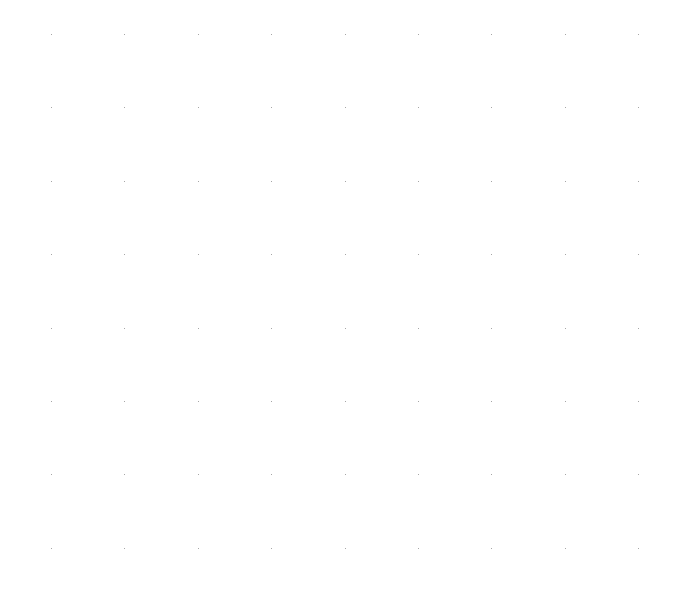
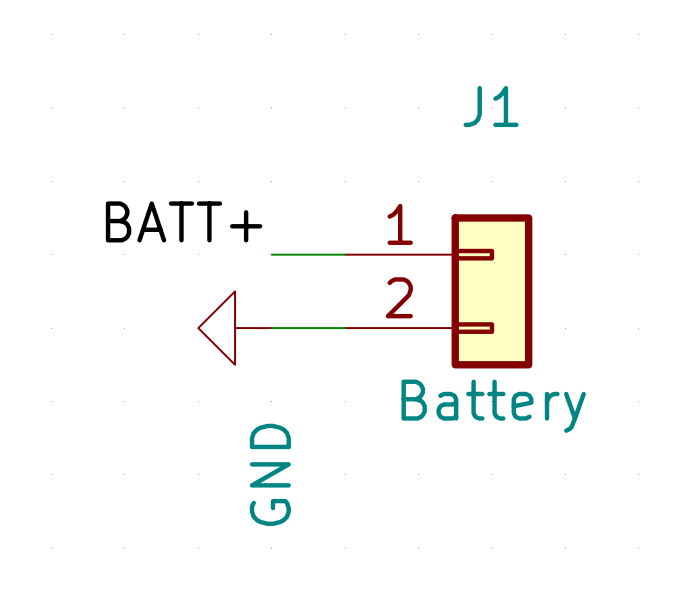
label: none -> BATT+ (184, 221)
wire: none -> (271, 254) (345, 254)
J1: none -> Battery (438, 291)
power symbol: none -> GND (235, 328)
wire: none -> (271, 328) (345, 328)

